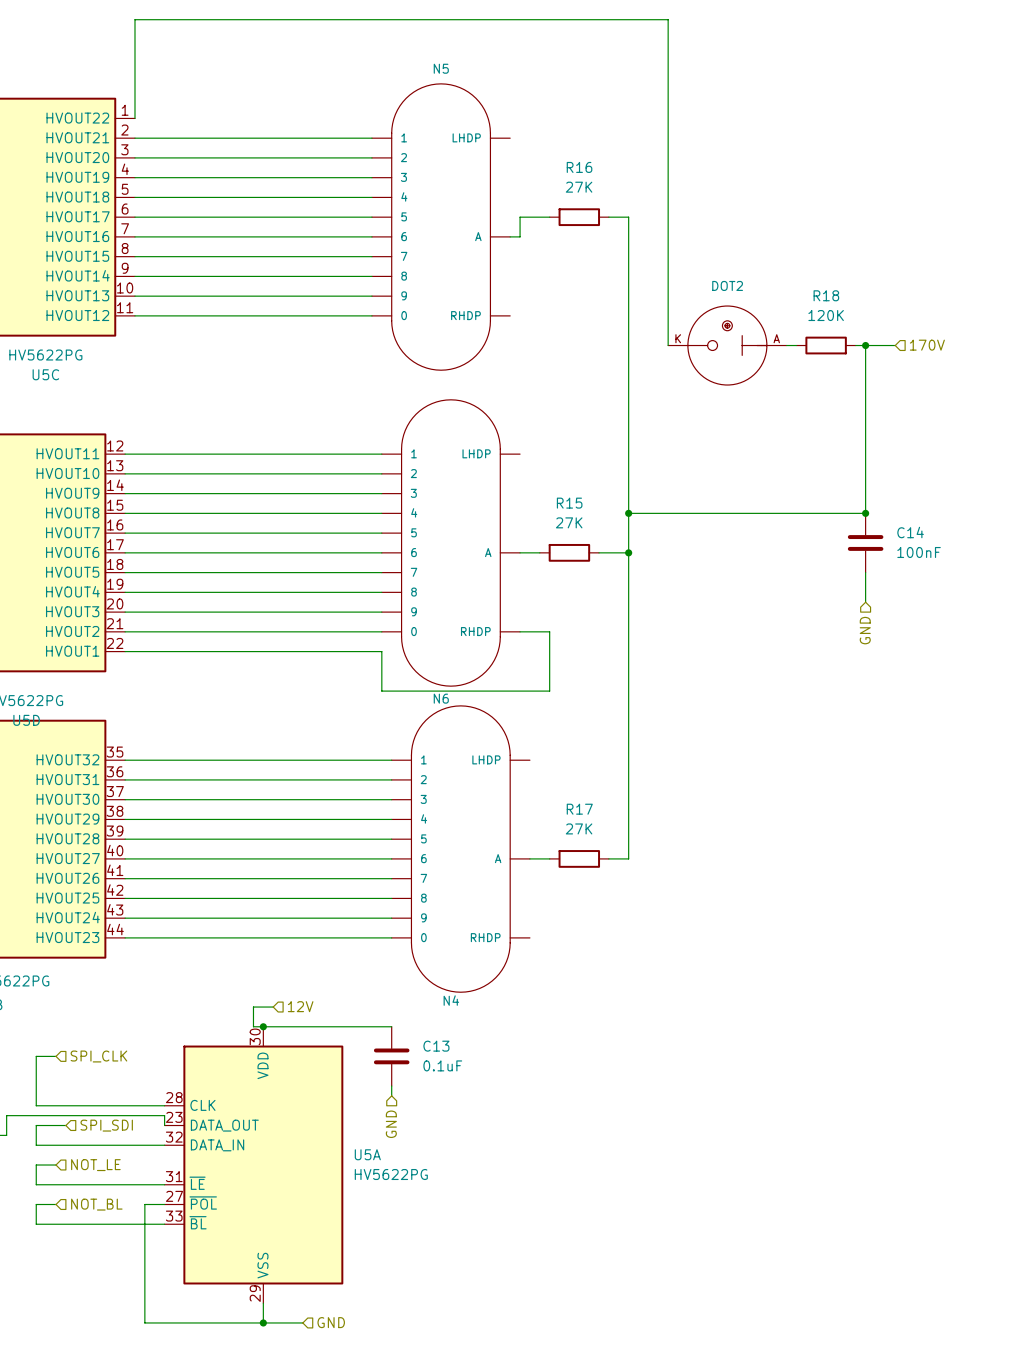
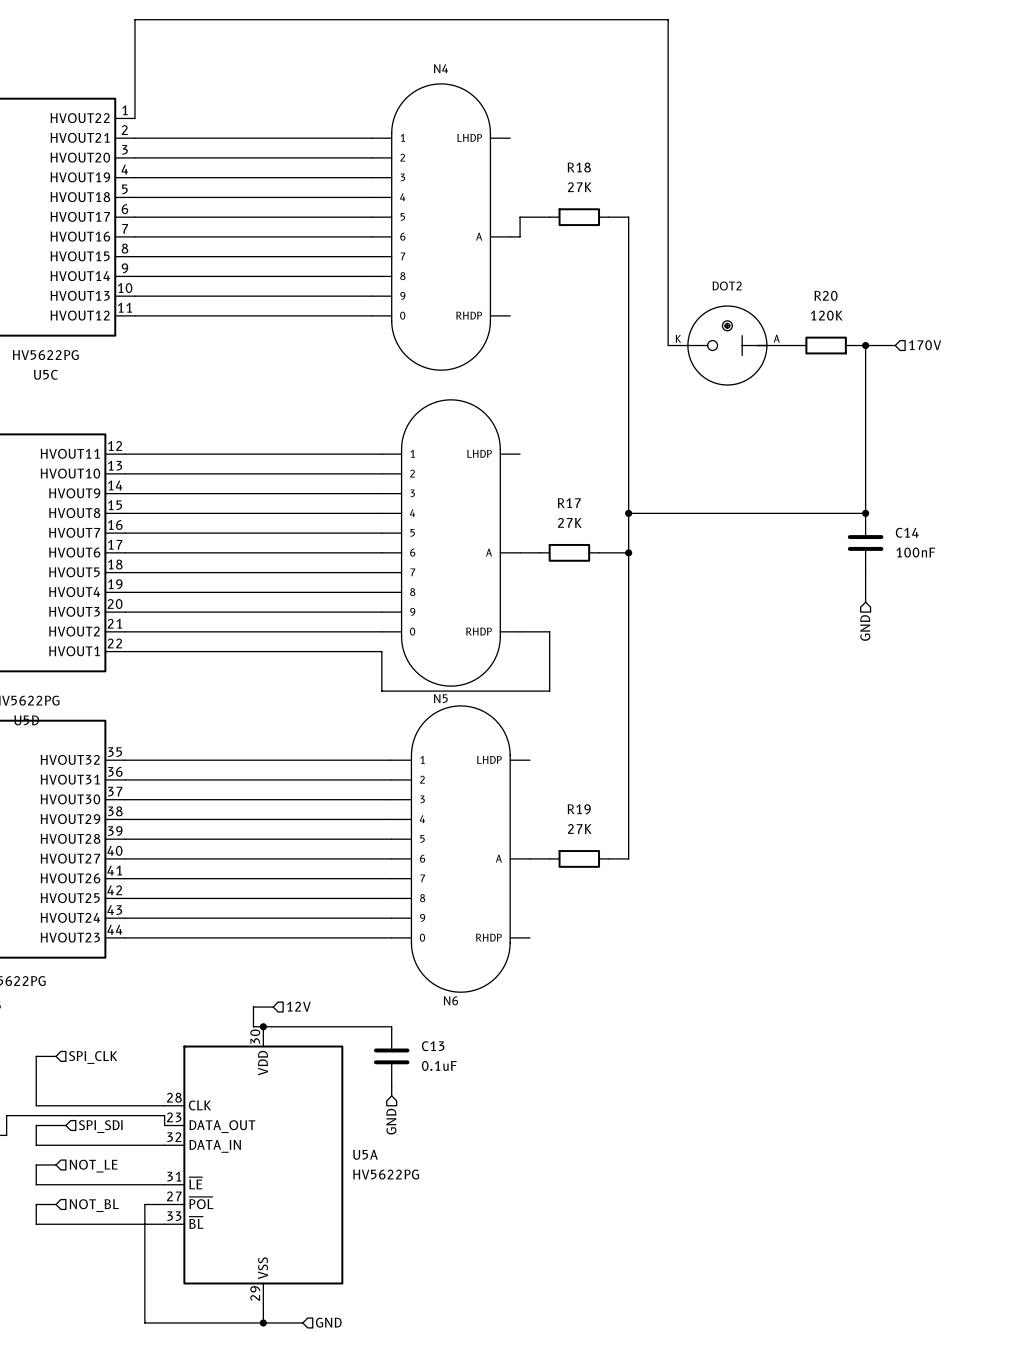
N5 name: N5 (441, 68) -> N4 (440, 68)
R16 name: R16 (579, 167) -> R18 (579, 167)
R18 name: R18 (826, 295) -> R20 (826, 295)
R15 name: R15 (569, 503) -> R17 (569, 503)
N6 name: N6 (441, 698) -> N5 (440, 698)
R17 name: R17 (579, 809) -> R19 (579, 809)
N4 name: N4 (451, 1000) -> N6 (450, 1000)

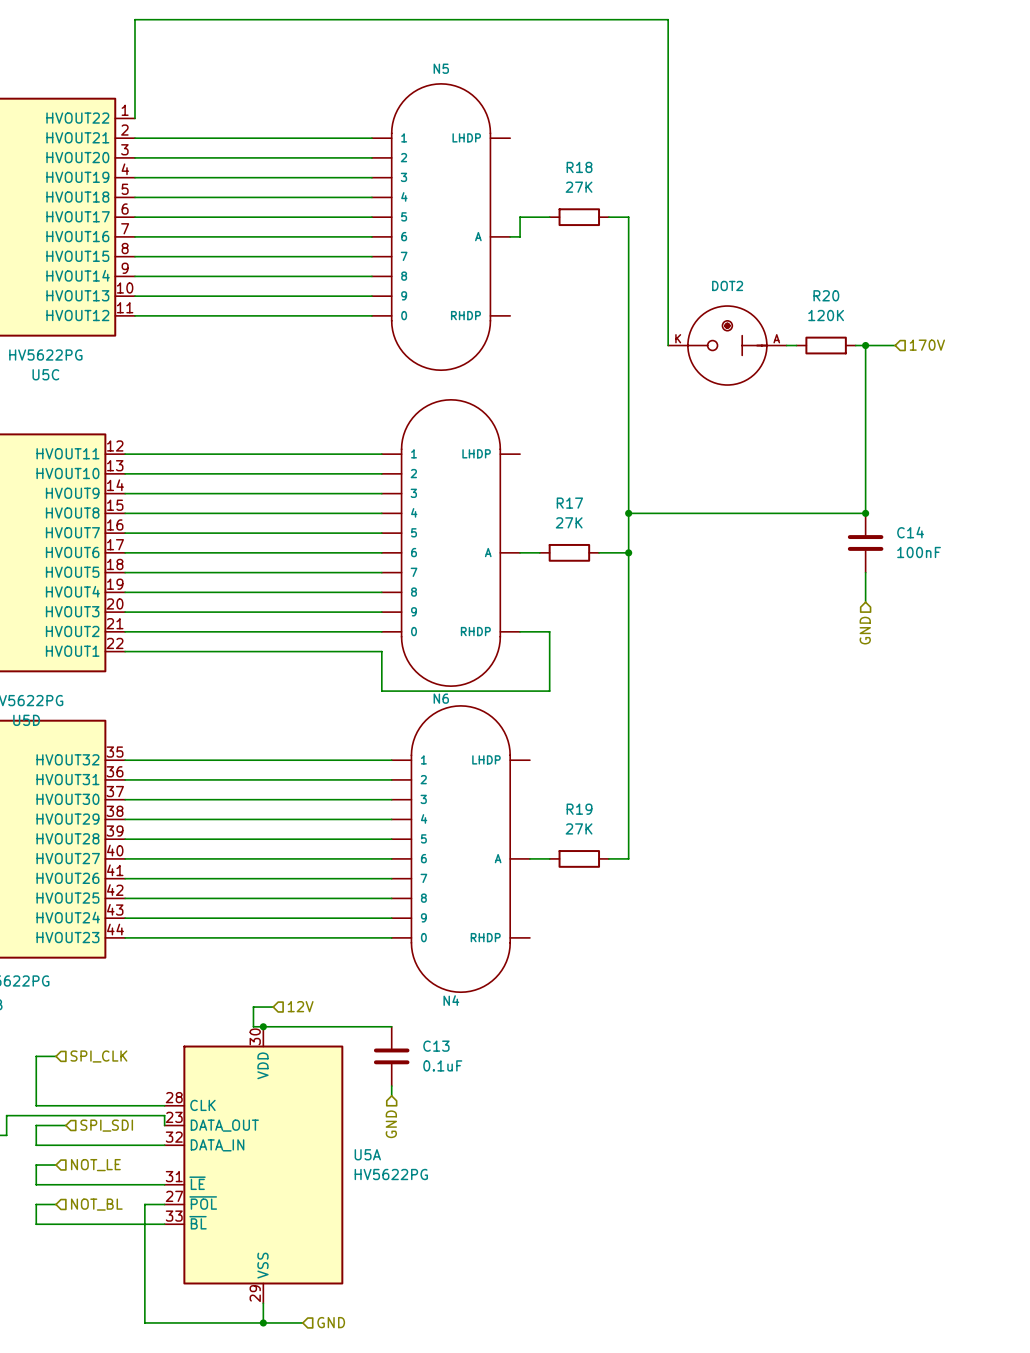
N4 name: N4 (440, 68) -> N5 (441, 68)
N5 name: N5 (440, 698) -> N6 (441, 698)
N6 name: N6 (450, 1000) -> N4 (451, 1000)

